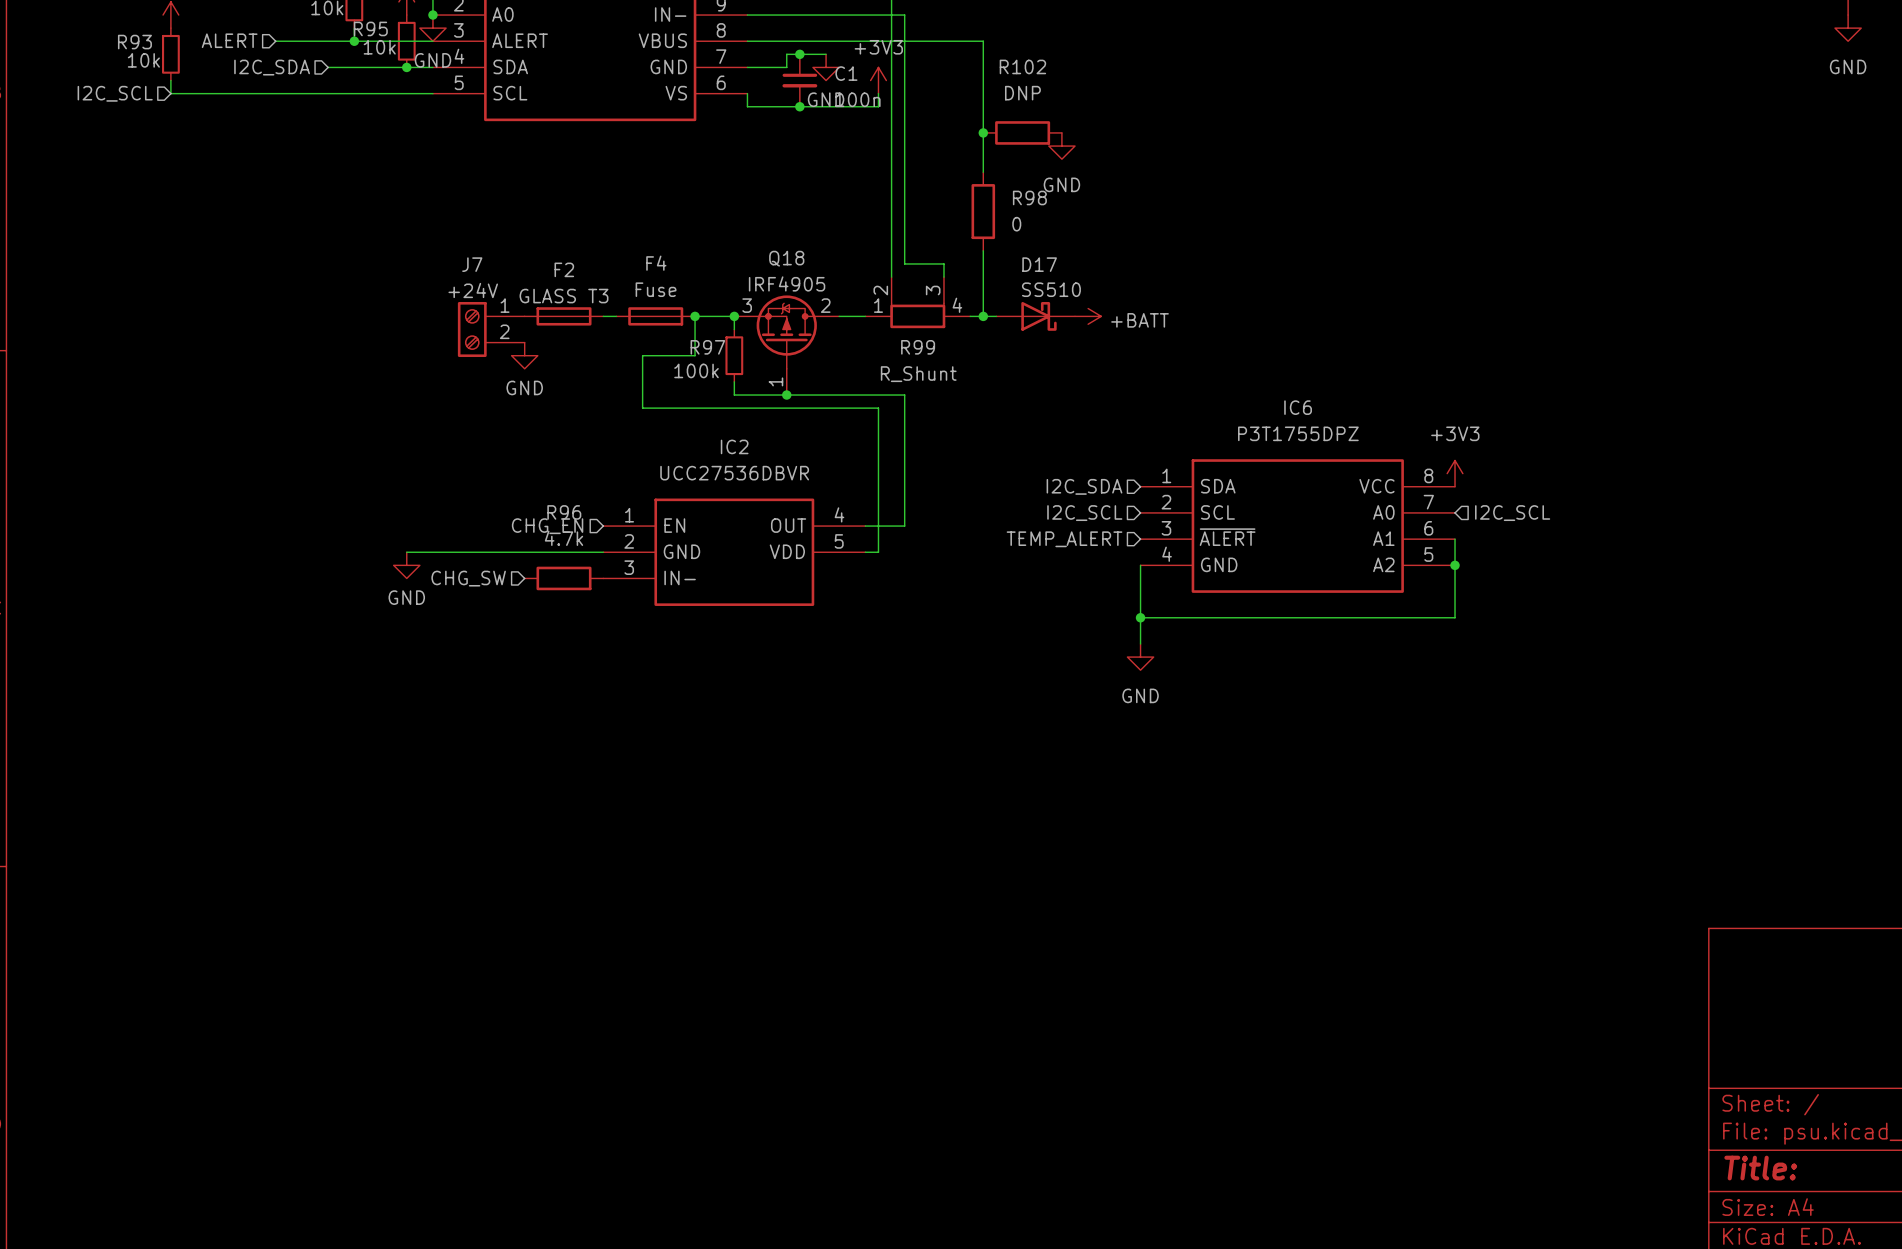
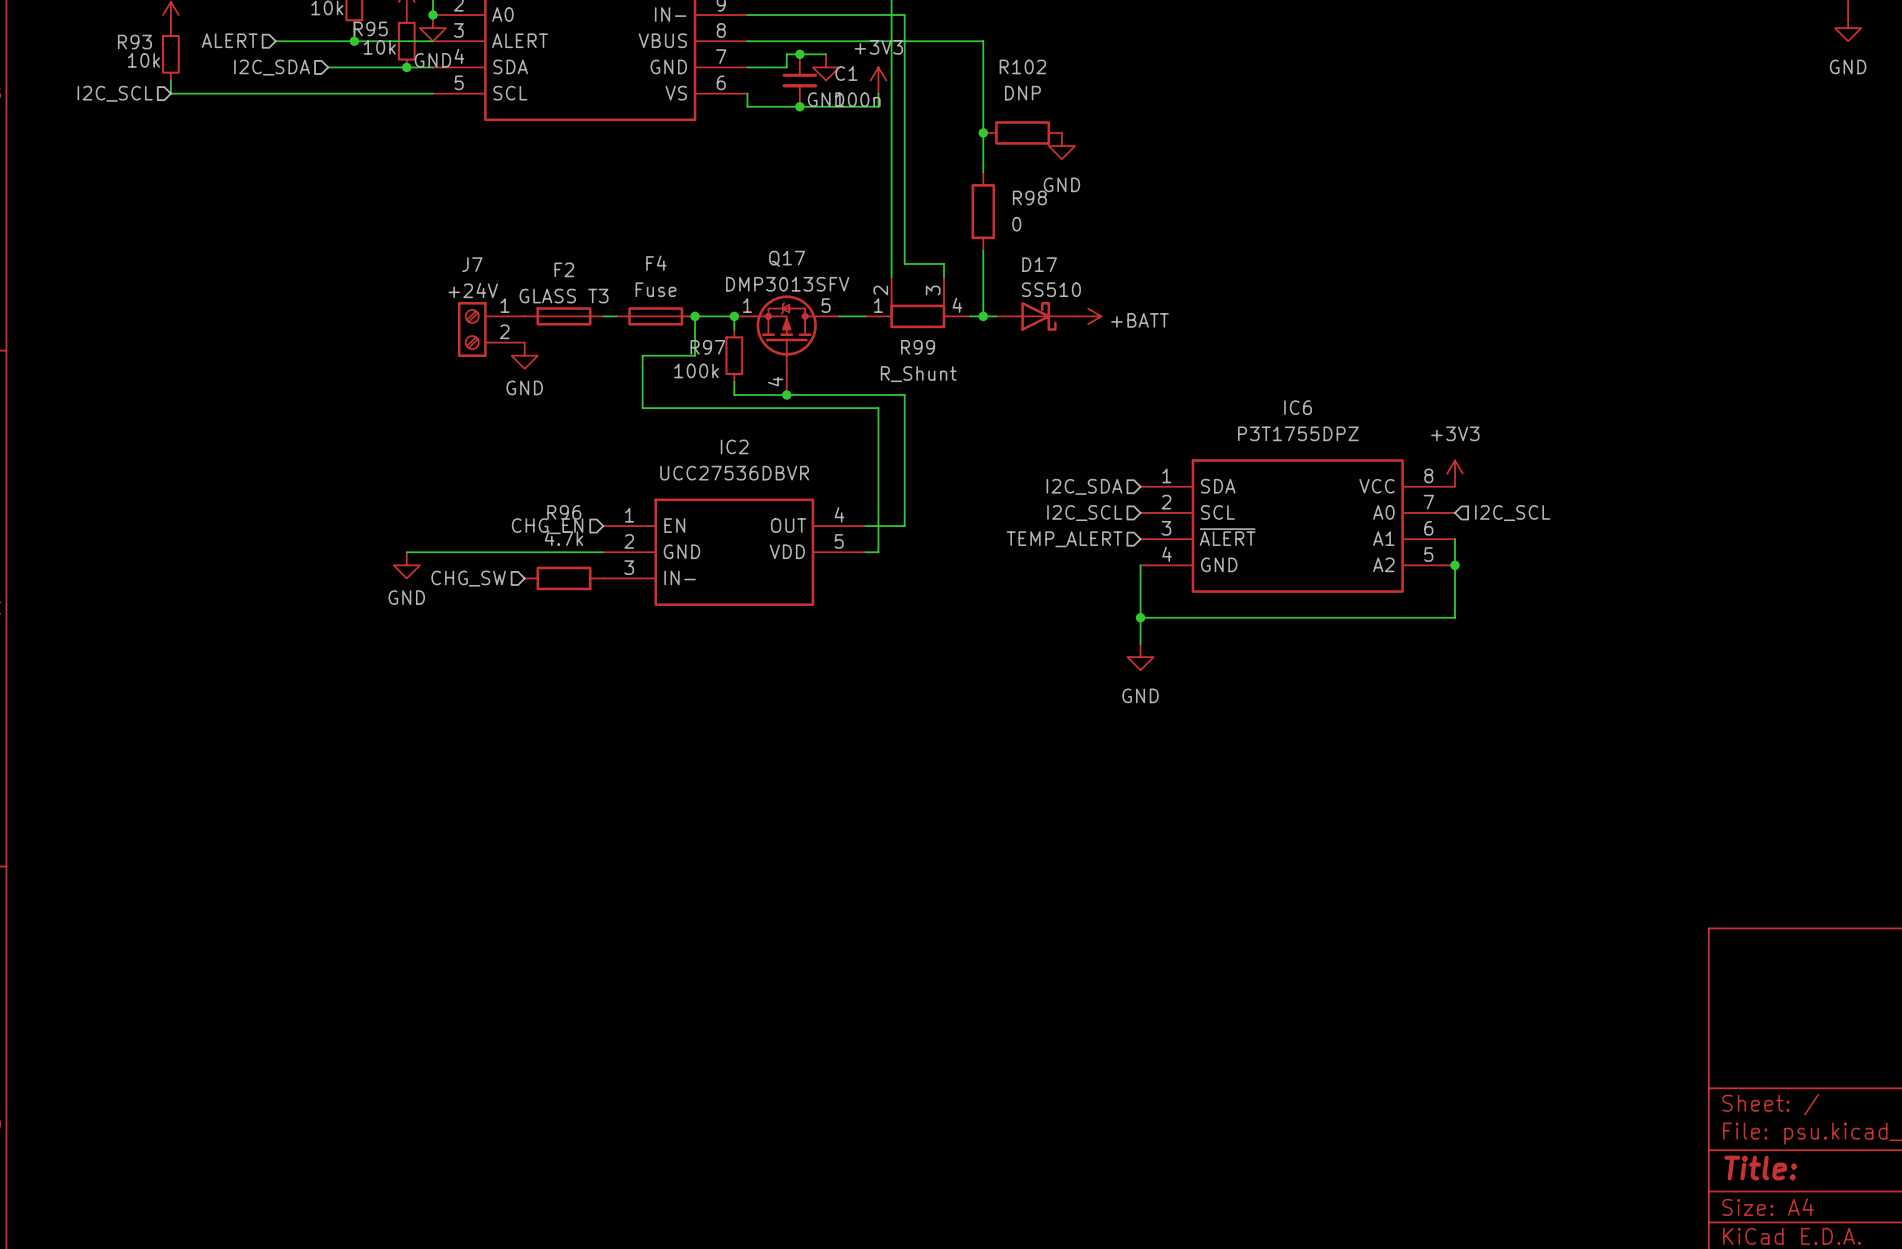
Q18 name: Q18 (786, 258) -> Q17 (787, 258)
Q18 value: IRF4905 (787, 283) -> DMP3013SFV (787, 284)
Q18 pin number: 3 (747, 305) -> 1 (747, 305)
Q18 pin number: 2 (825, 305) -> 5 (826, 305)
Q18 pin number: 1 (775, 381) -> 4 (775, 381)

